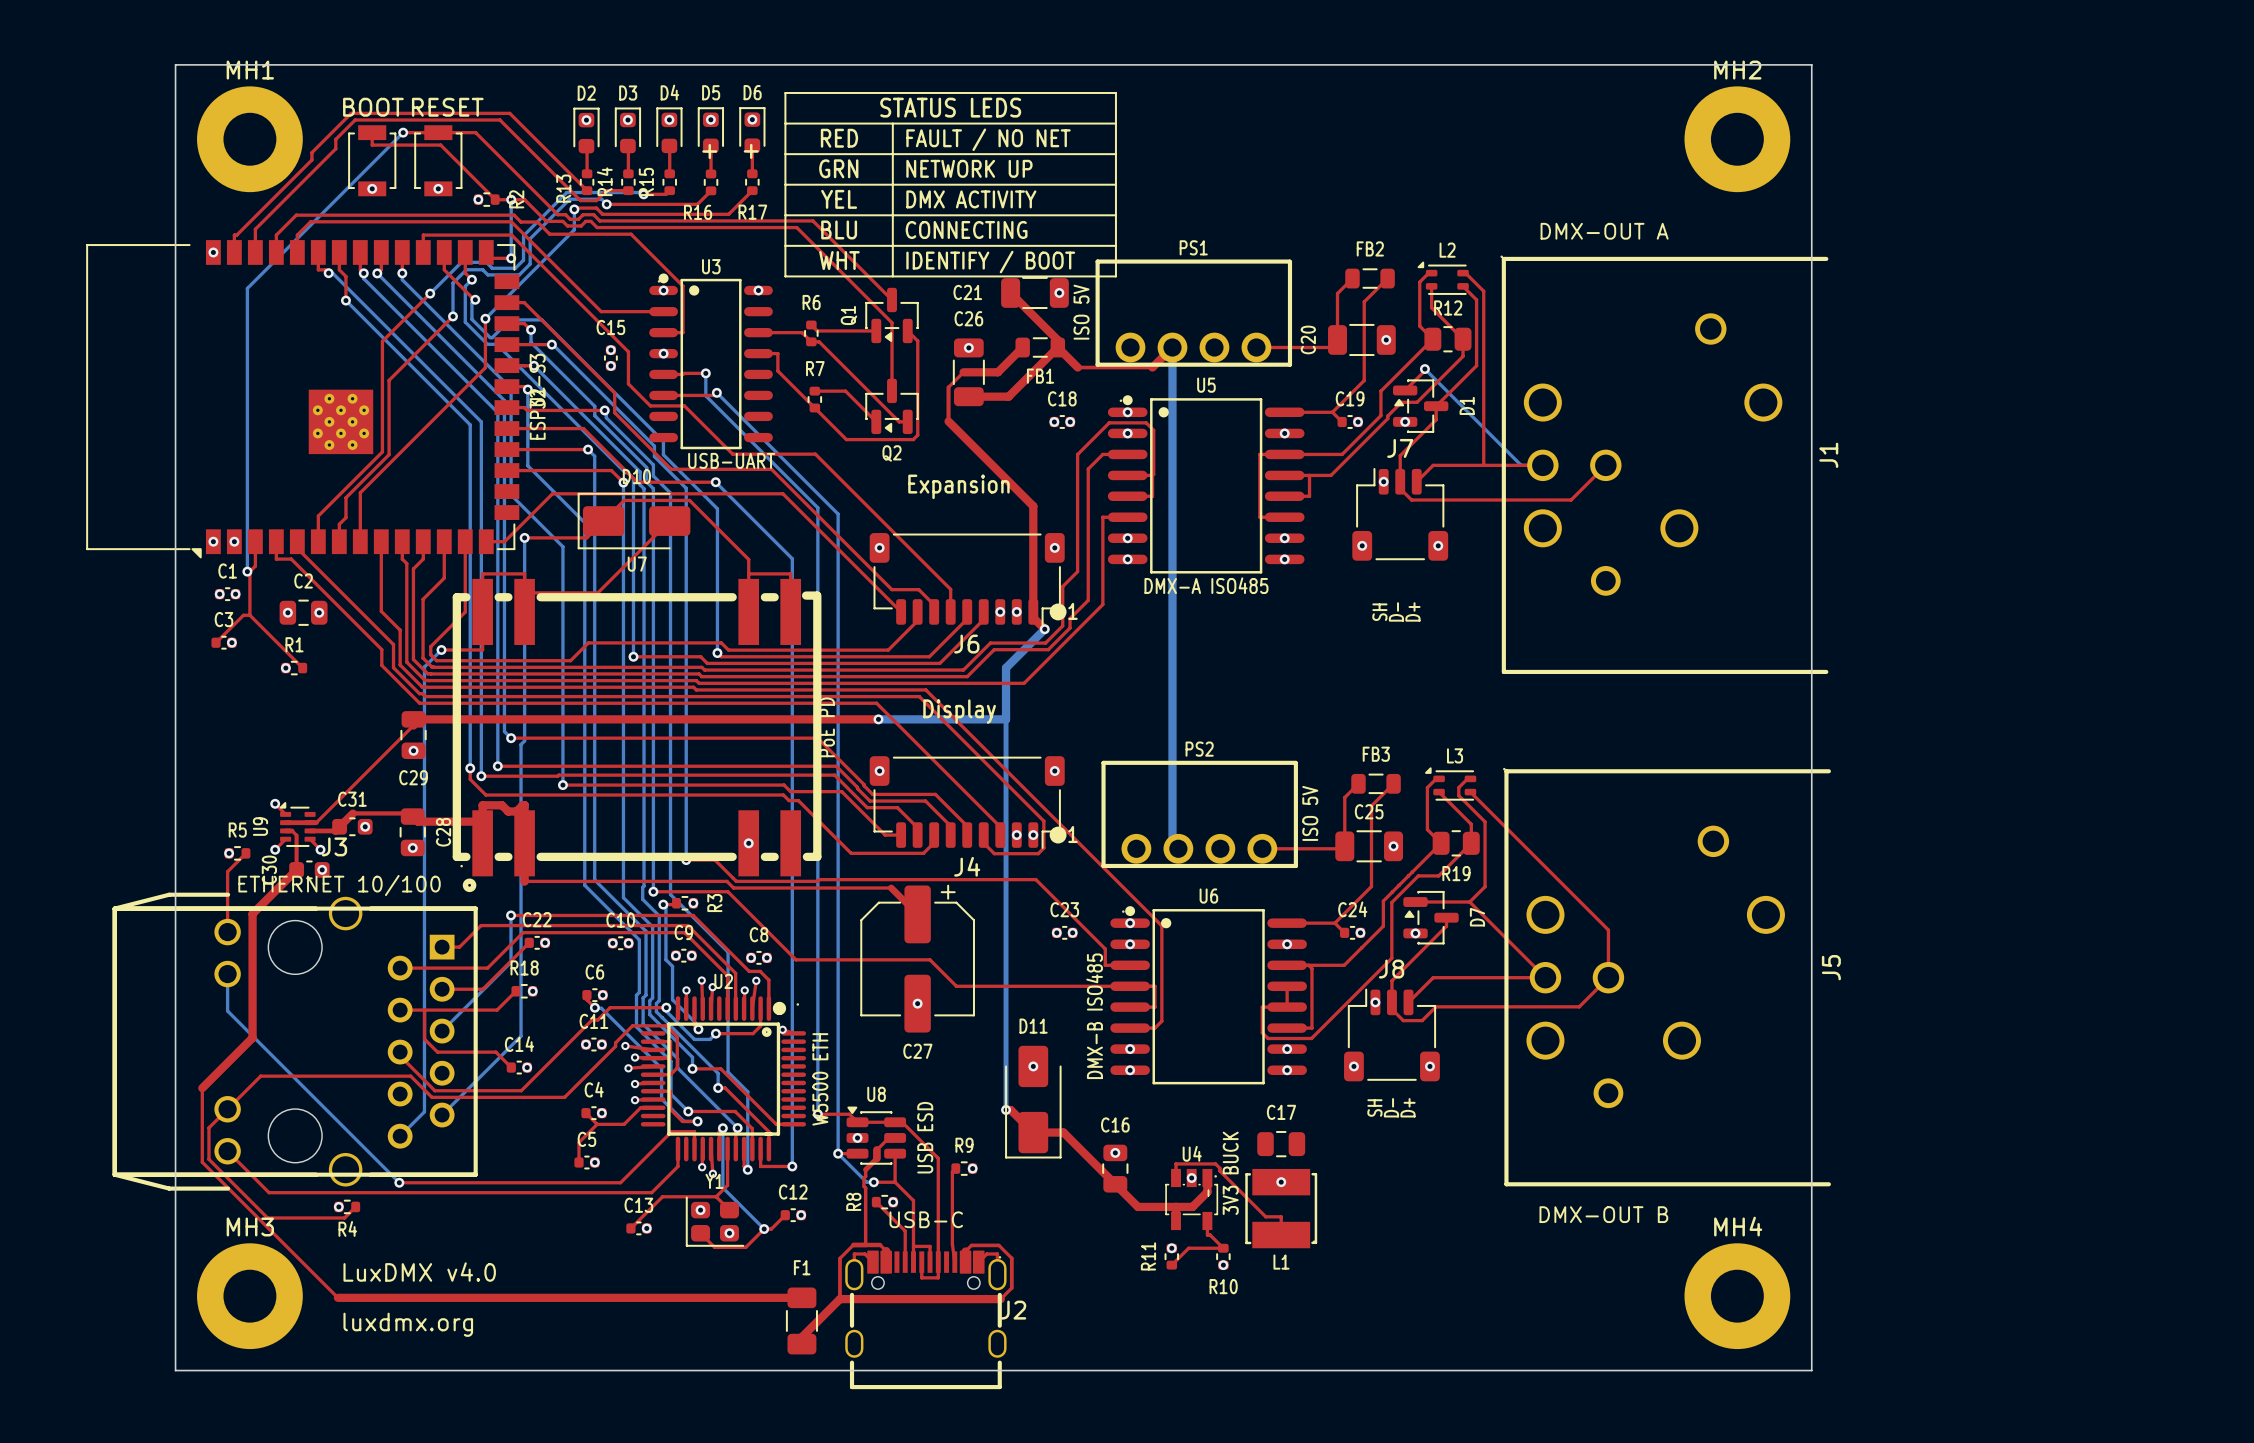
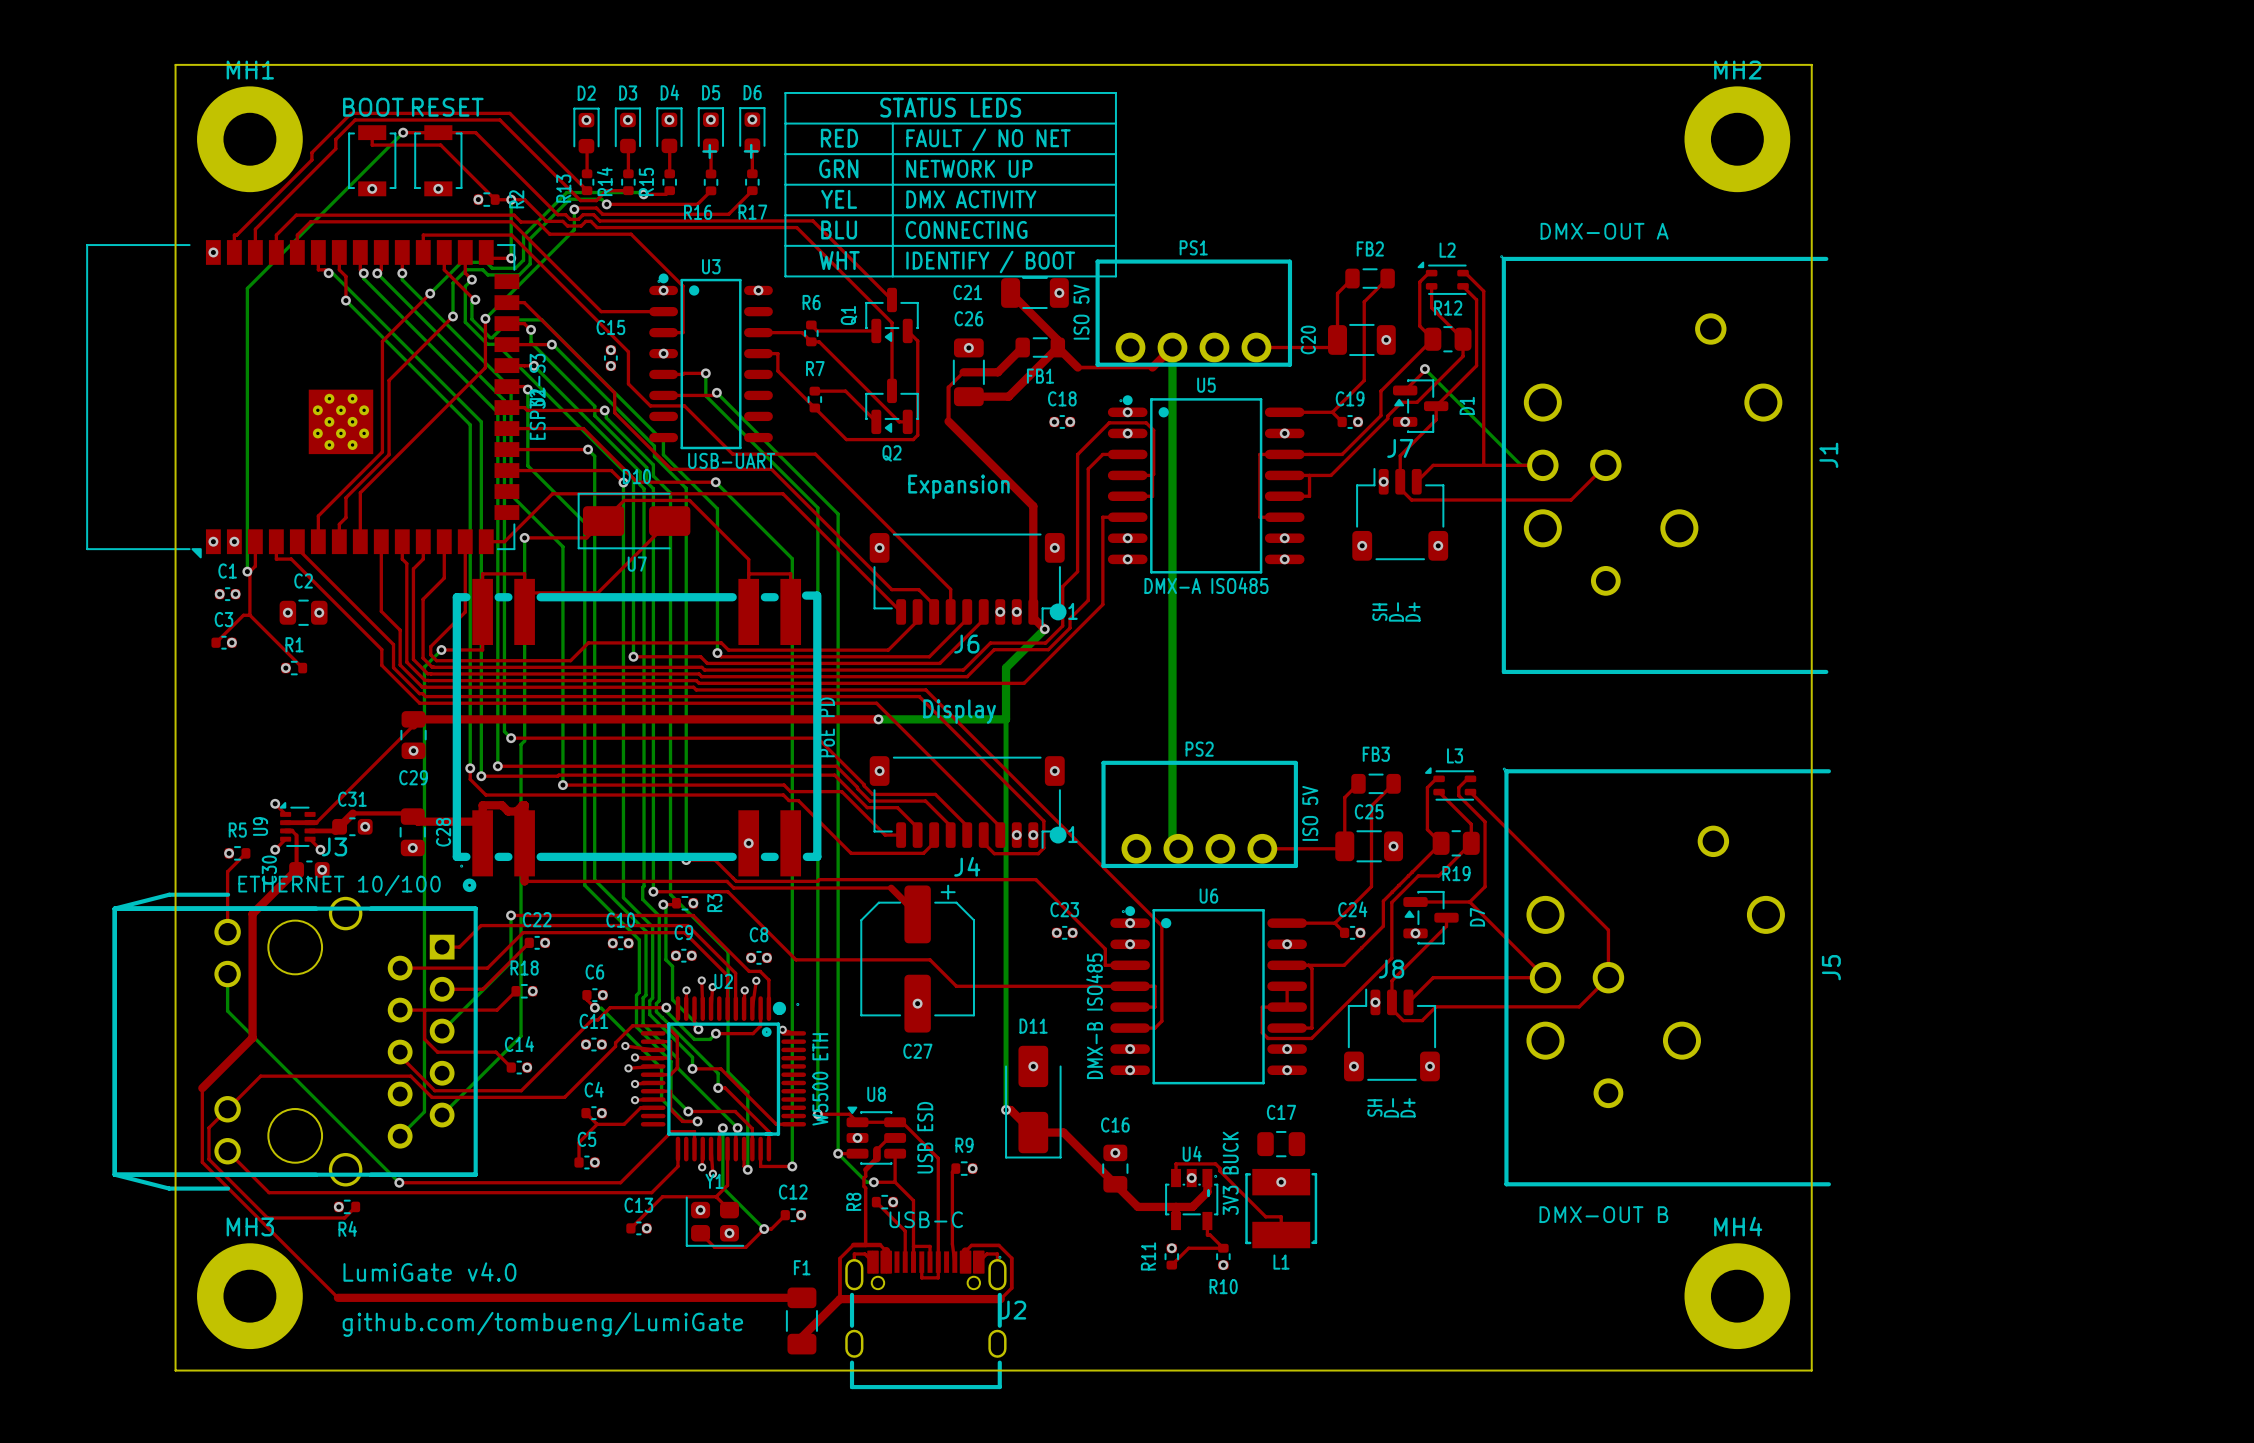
text: LuxDMX v4.0 (419, 1272) -> LumiGate v4.0 (429, 1272)
text: luxdmx.org (408, 1324) -> github.com/tombueng/LumiGate (542, 1324)

